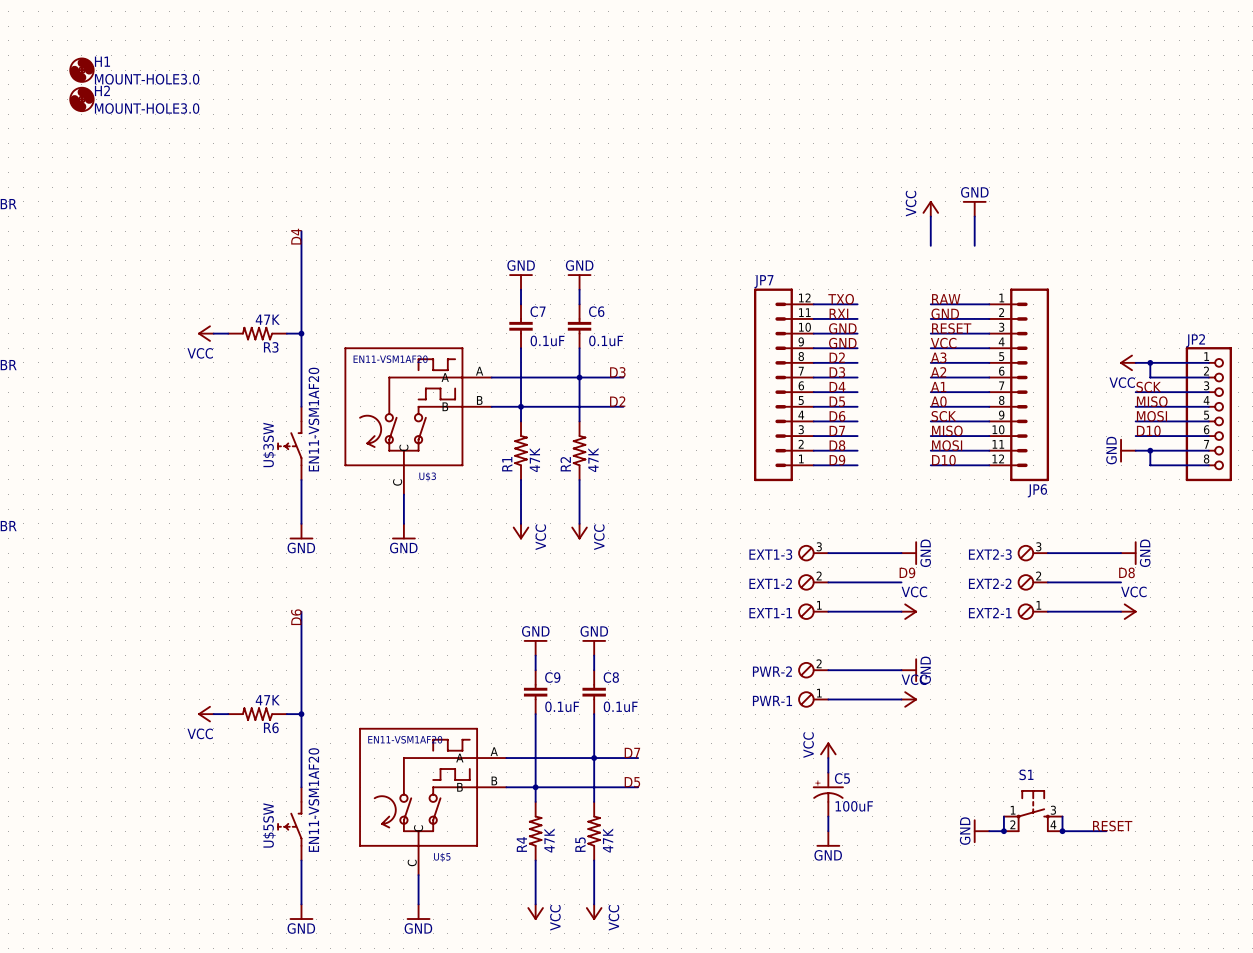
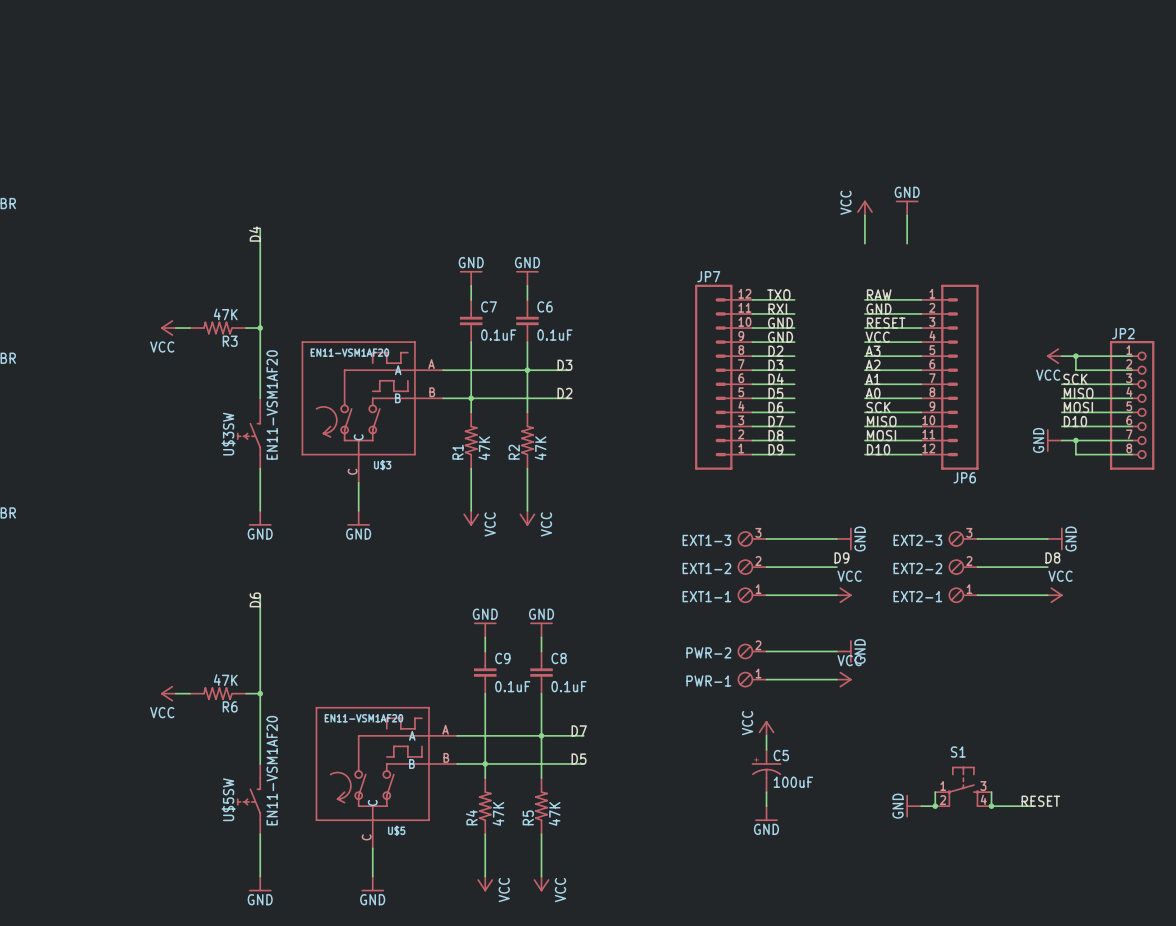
H1: MOUNT-HOLE3.0 (81, 70) -> none
H2: MOUNT-HOLE3.0 (81, 99) -> none

